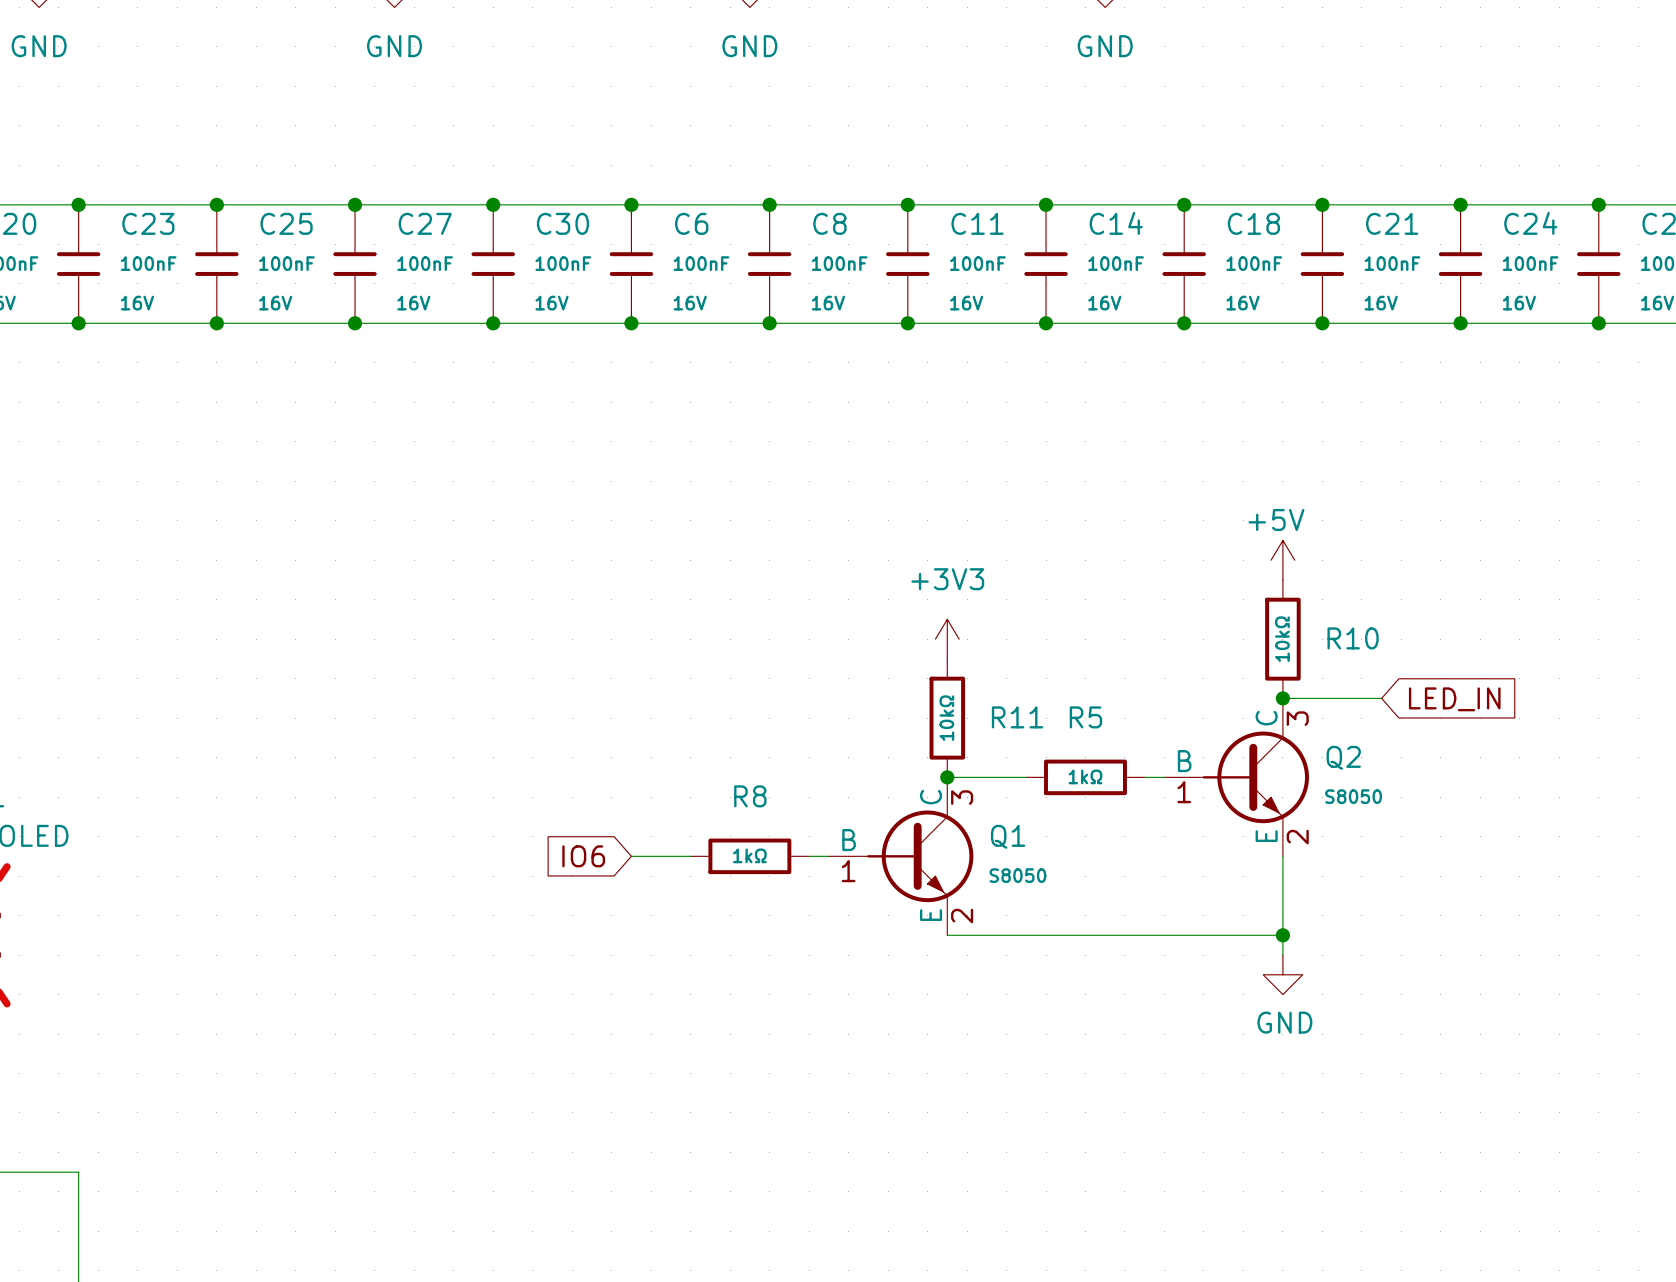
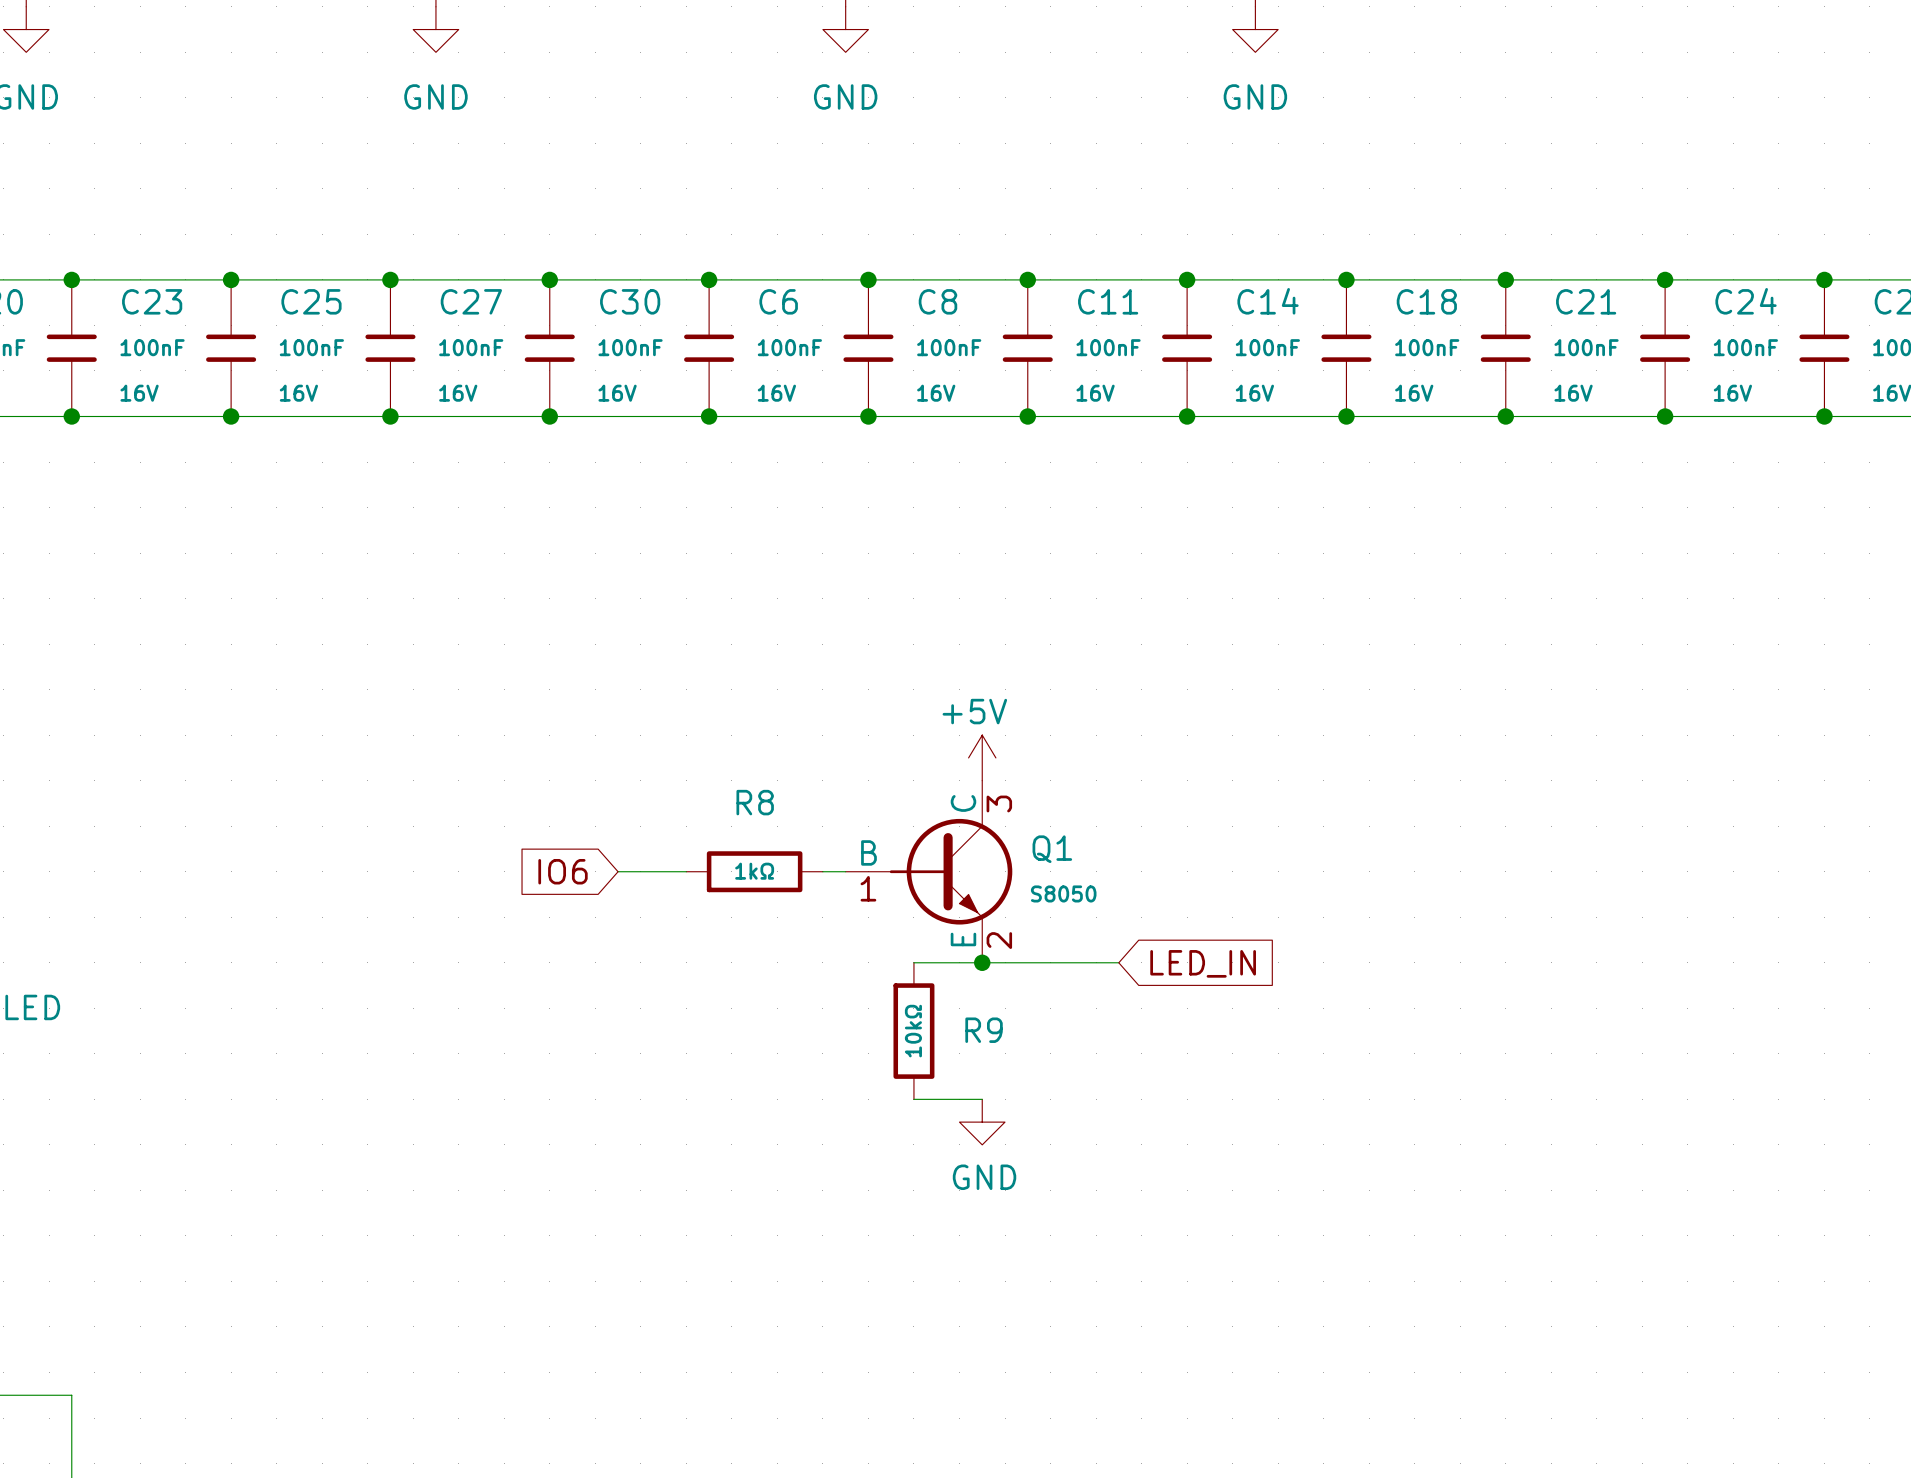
power symbol: +5V (1282, 560) -> none
power symbol: none -> +5V (982, 757)
power symbol: +3V3 (947, 639) -> none
R10: 10kΩ (1282, 639) -> none
wire: (1282, 698) (1381, 698) -> none
junction: (1282, 698) -> none
global label: LED_IN (1454, 699) -> none
R11: 10kΩ (947, 718) -> none
wire: (947, 777) (1026, 777) -> none
junction position: (947, 777) -> (982, 962)
R5: 1kΩ (1085, 777) -> none
wire: (1144, 777) (1164, 777) -> none
Q2: S8050 (1236, 777) -> none
wire: none -> (913, 962) (1118, 962)
global label: none -> LED_IN (1203, 963)
global label position: IO6 (583, 856) -> IO6 (563, 871)
wire: (631, 856) (690, 856) -> (618, 871) (686, 871)
R8 position: (749, 856) -> (754, 871)
wire: (809, 856) (828, 856) -> (822, 871) (845, 871)
R9: none -> 10kΩ (913, 1031)
Q1 position: (901, 856) -> (928, 871)
wire: (1282, 856) (1282, 955) -> none
wire: none -> (913, 1099) (982, 1099)
power symbol: none -> GND (982, 1122)
wire: (947, 935) (1282, 935) -> none
junction: (1282, 935) -> none
power symbol: GND (1282, 974) -> none

